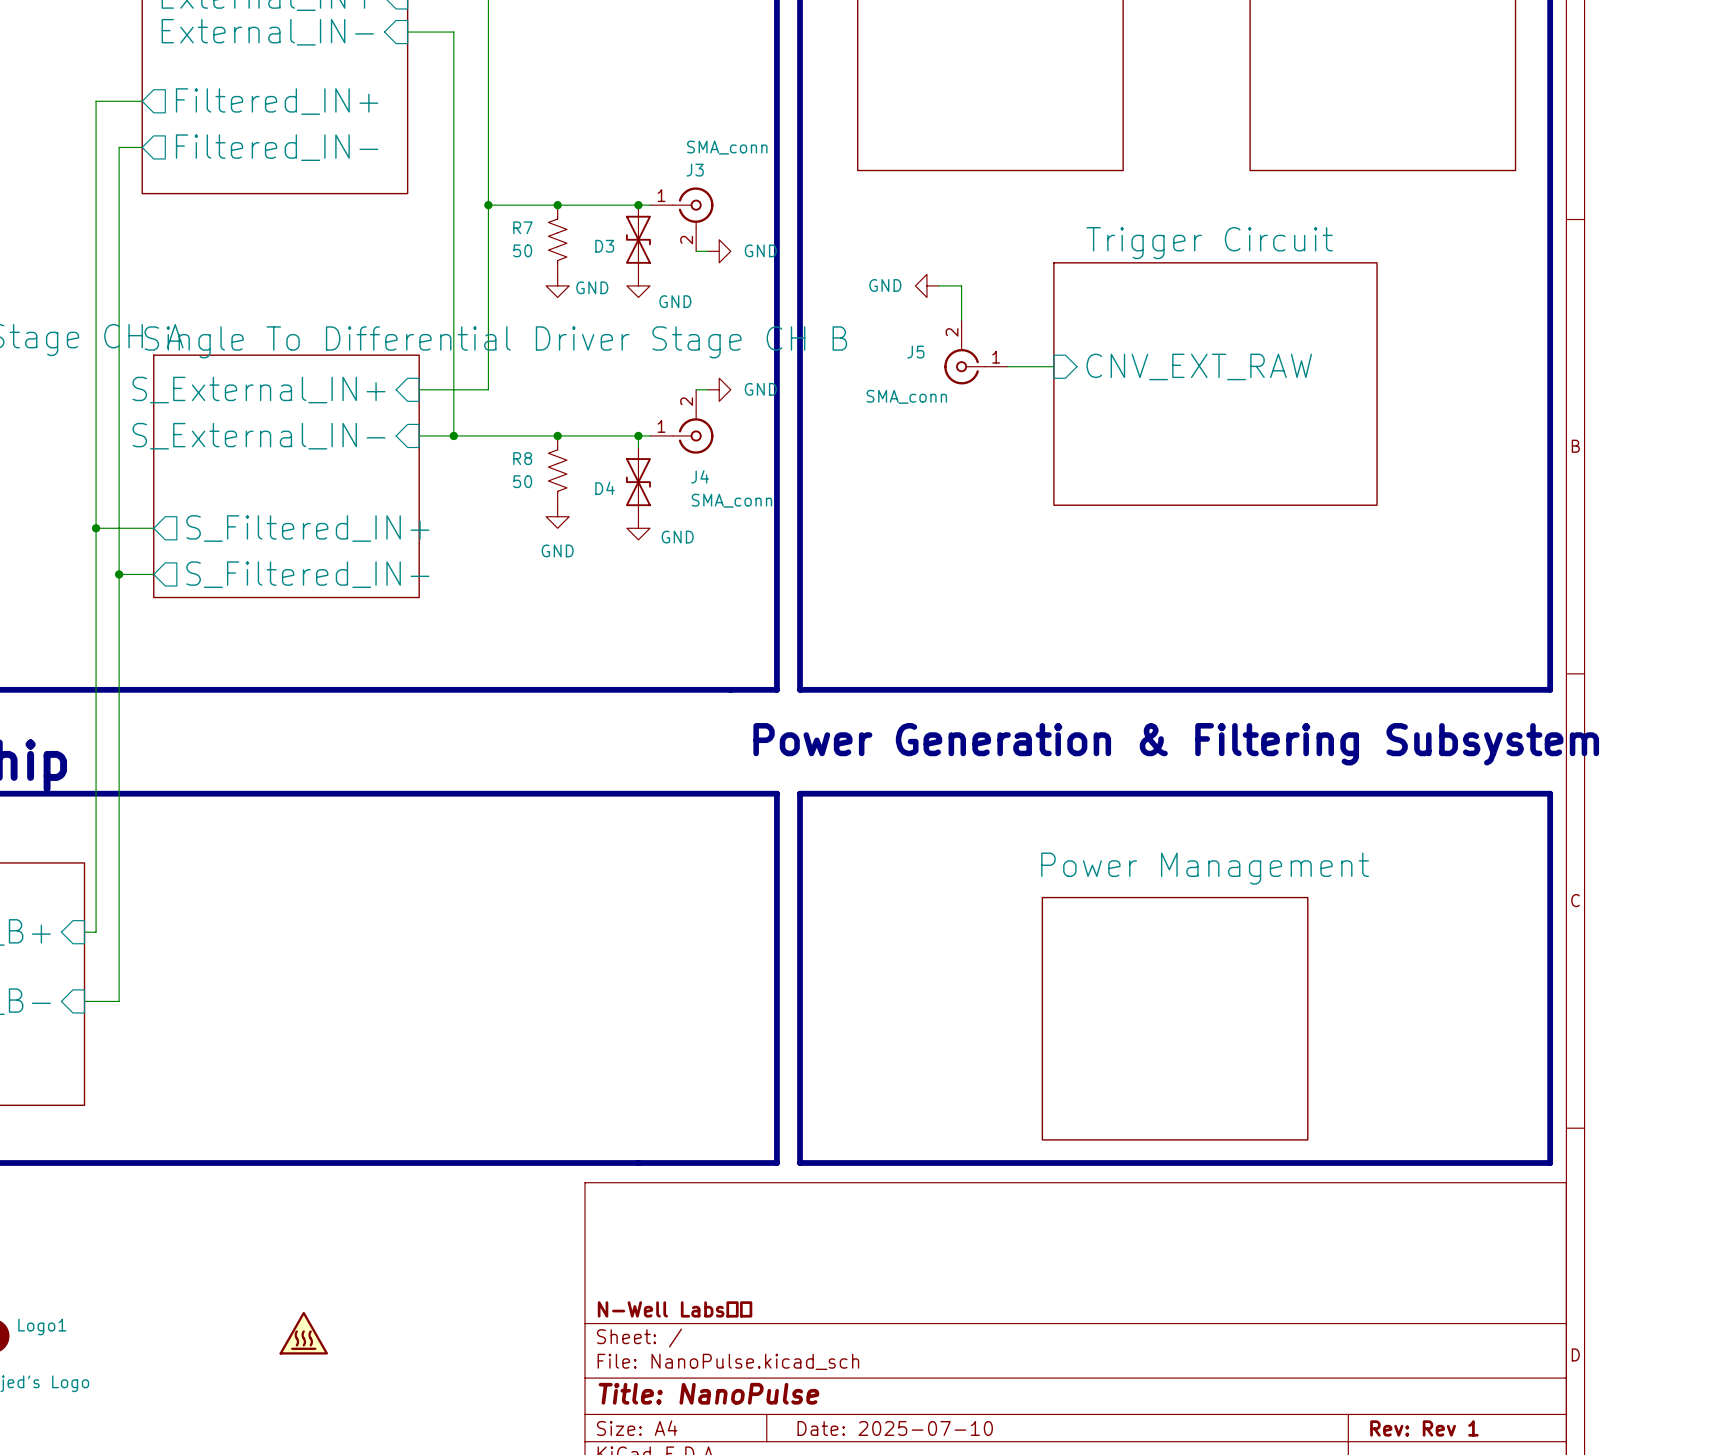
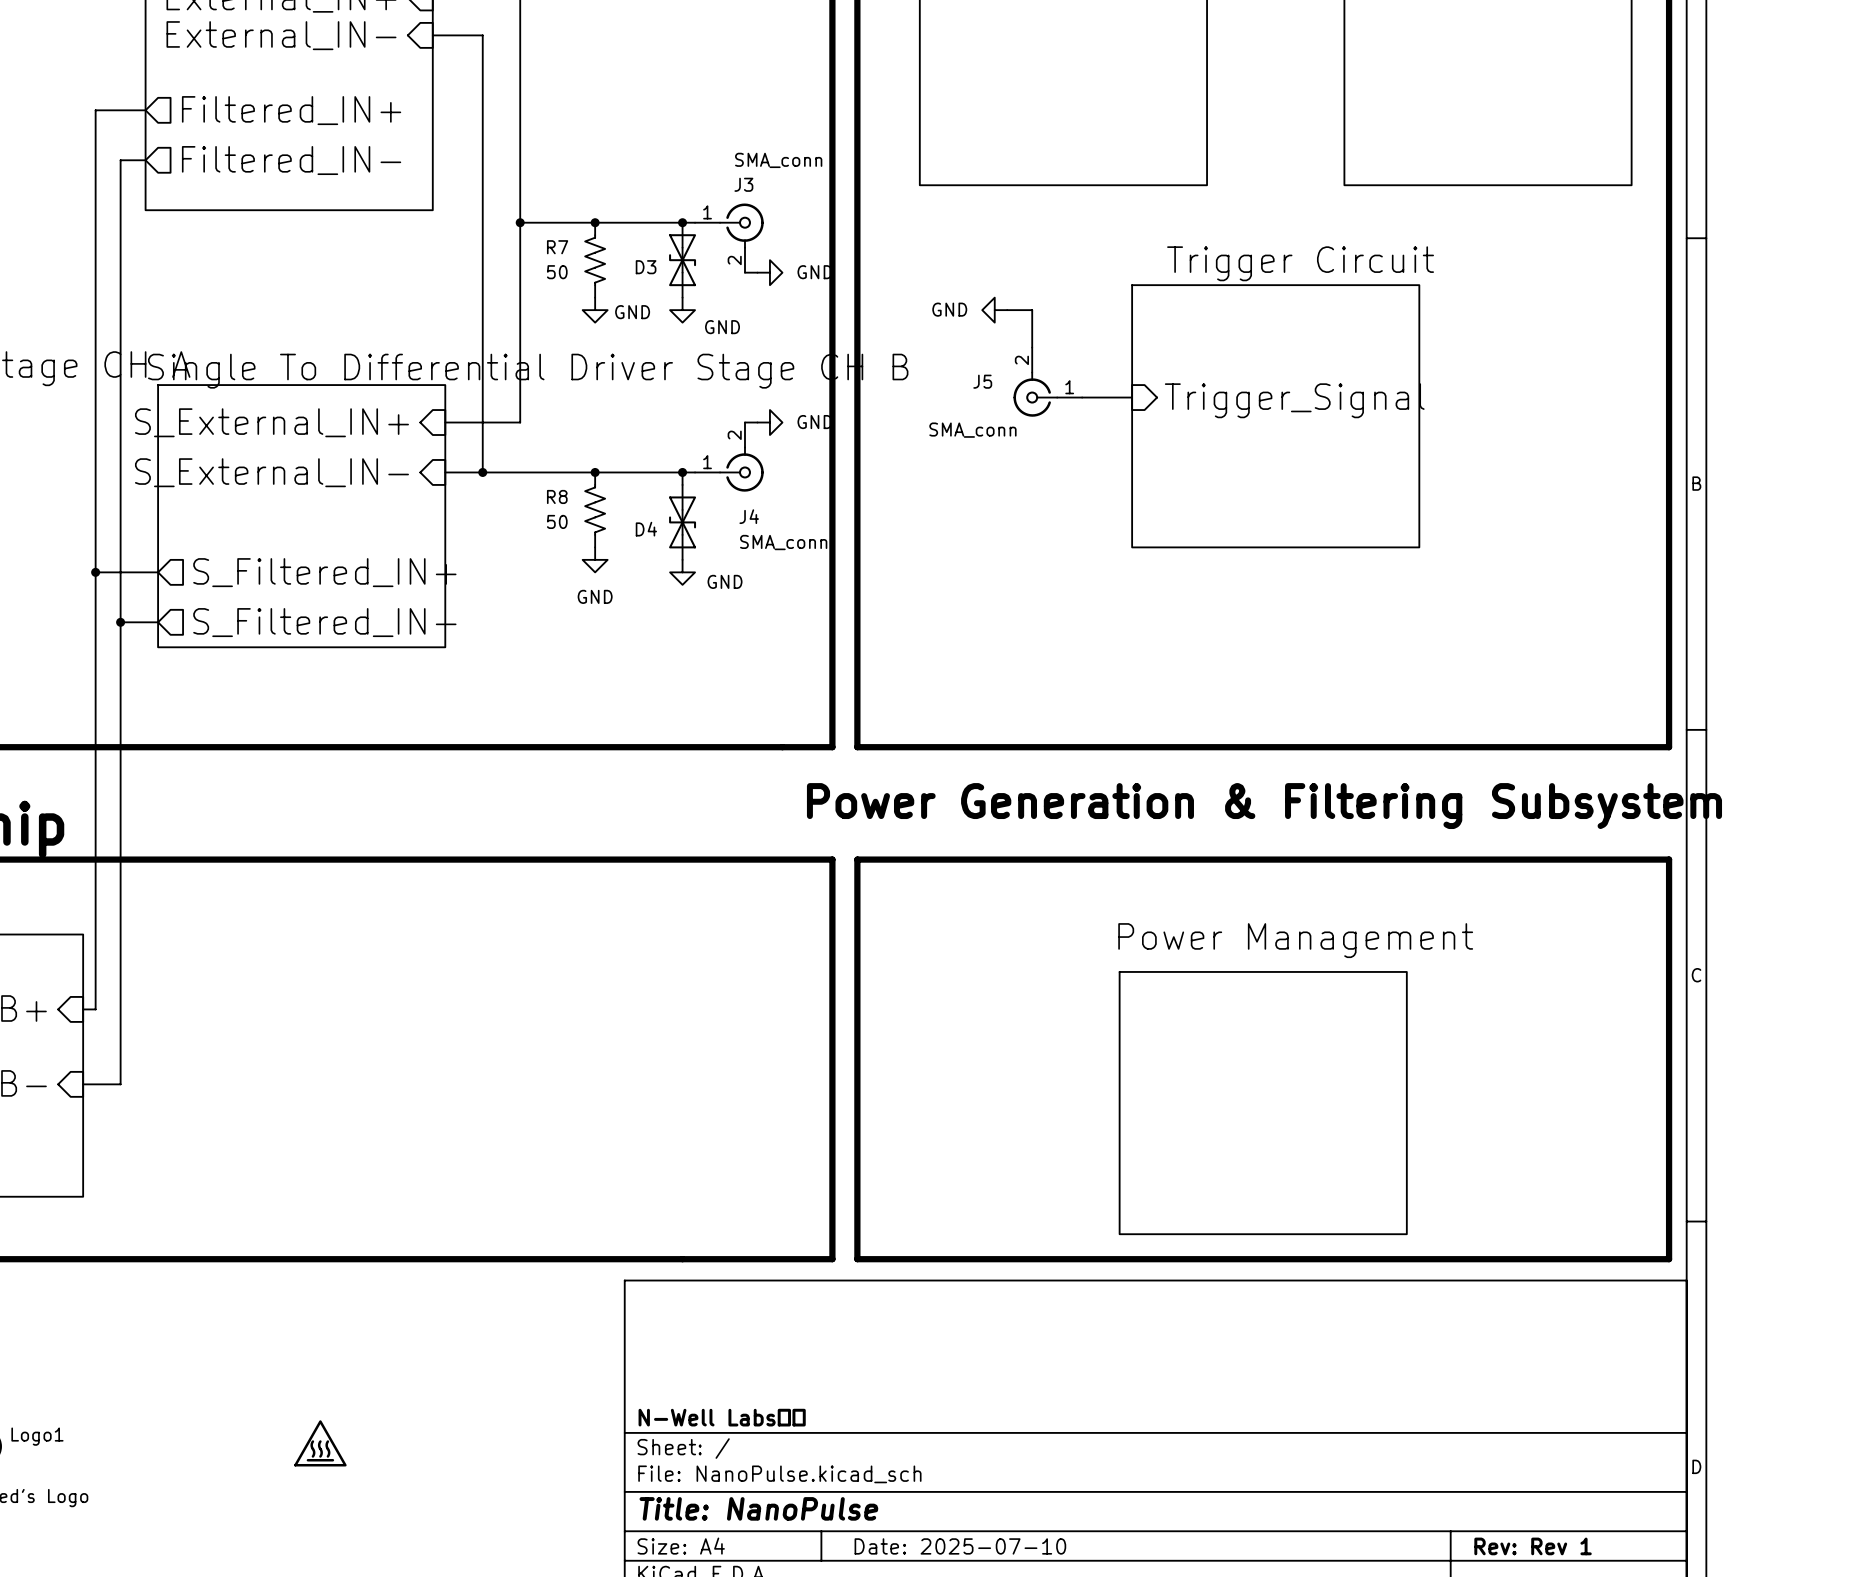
sheet pin: CNV_EXT_RAW (1199, 366) -> Trigger_Signal (1294, 400)
sheet Trigger Circuit: none -> (1275, 416)
sheet Trigger Circuit: (1215, 384) -> none

